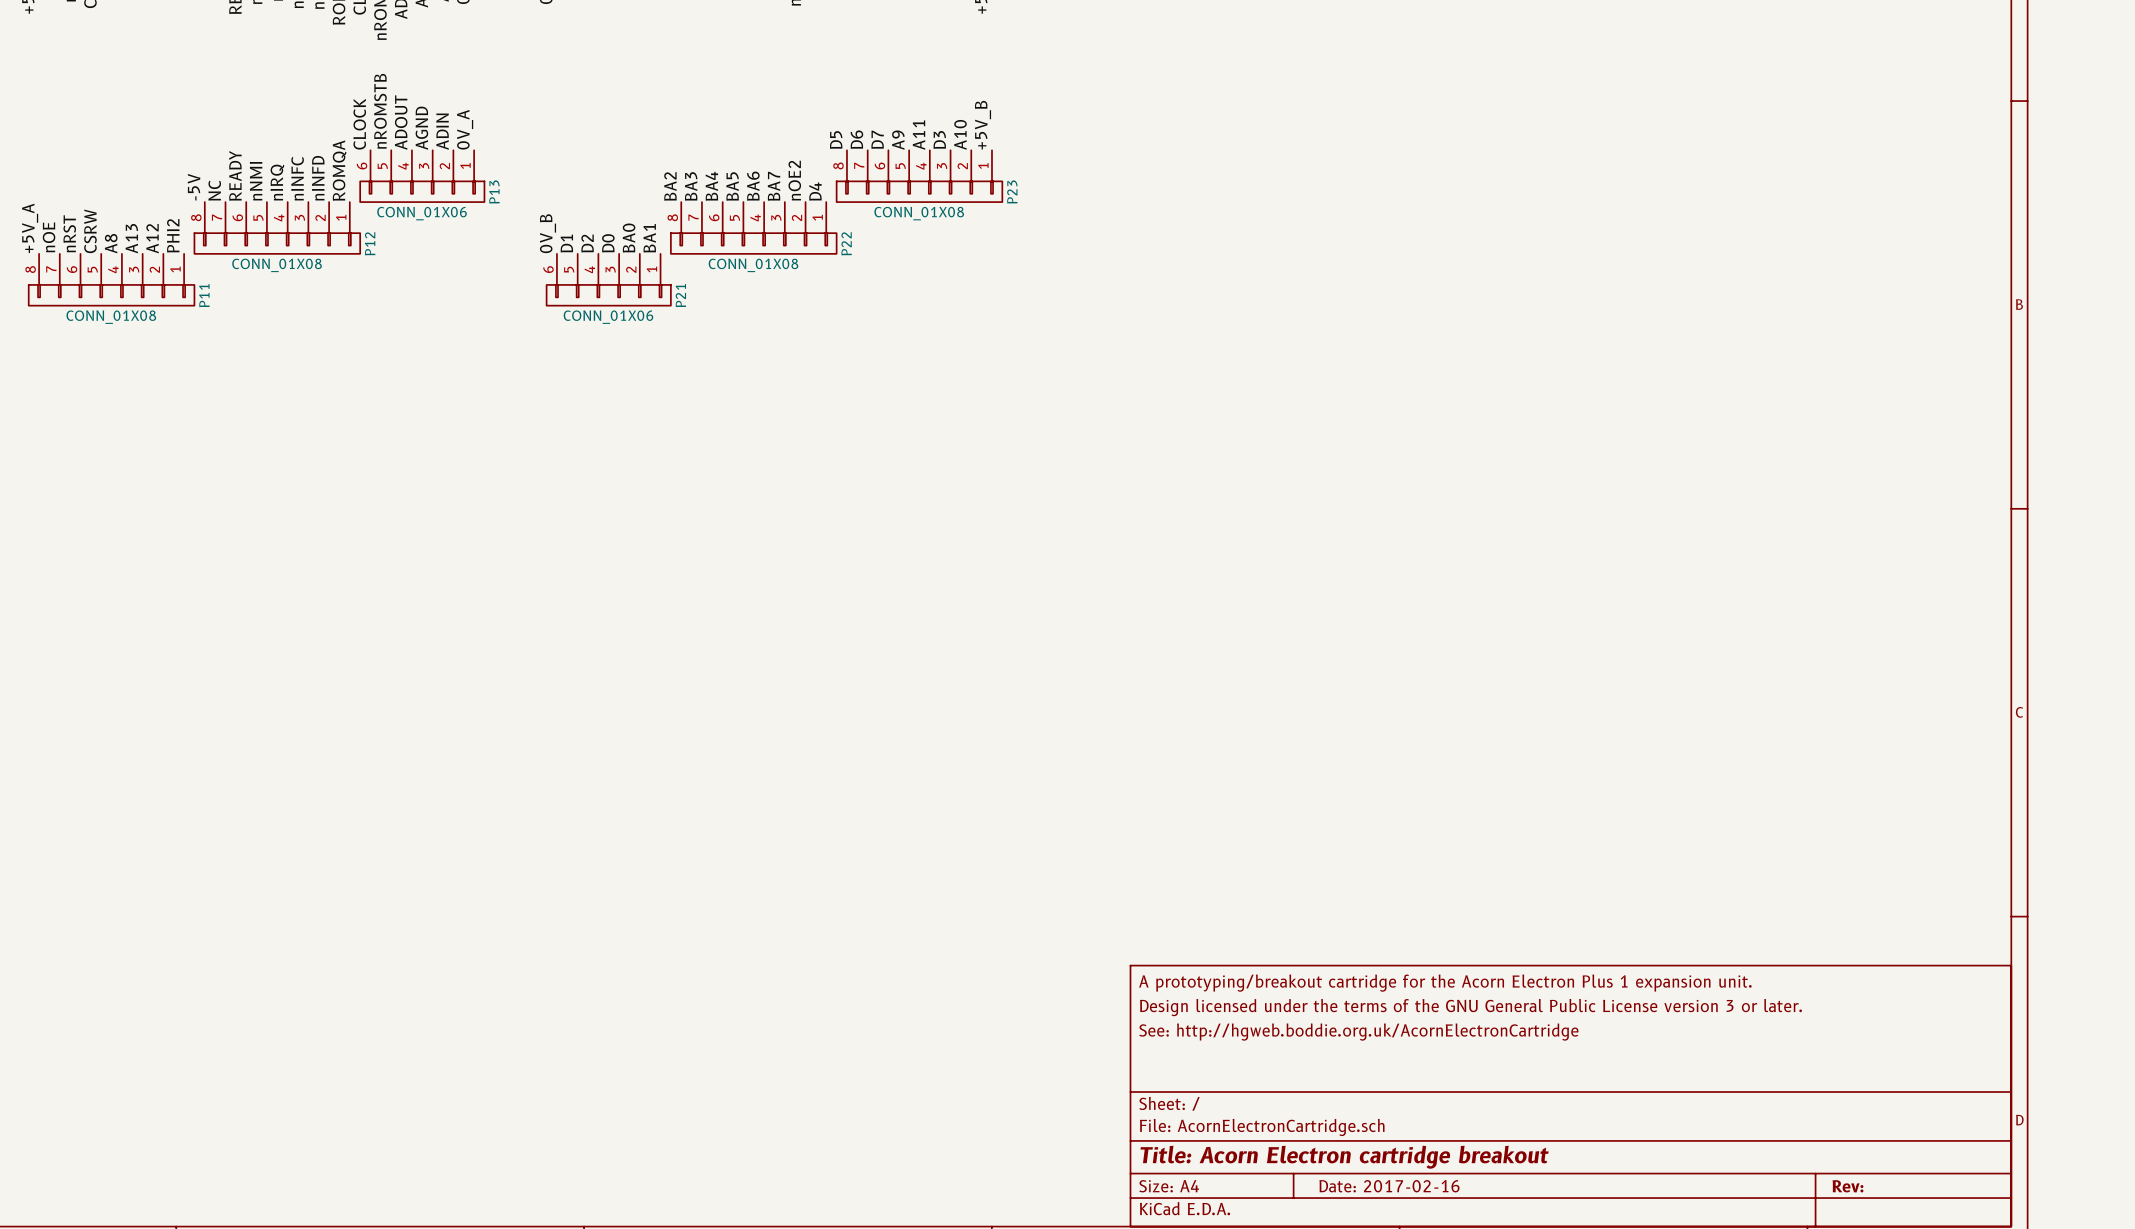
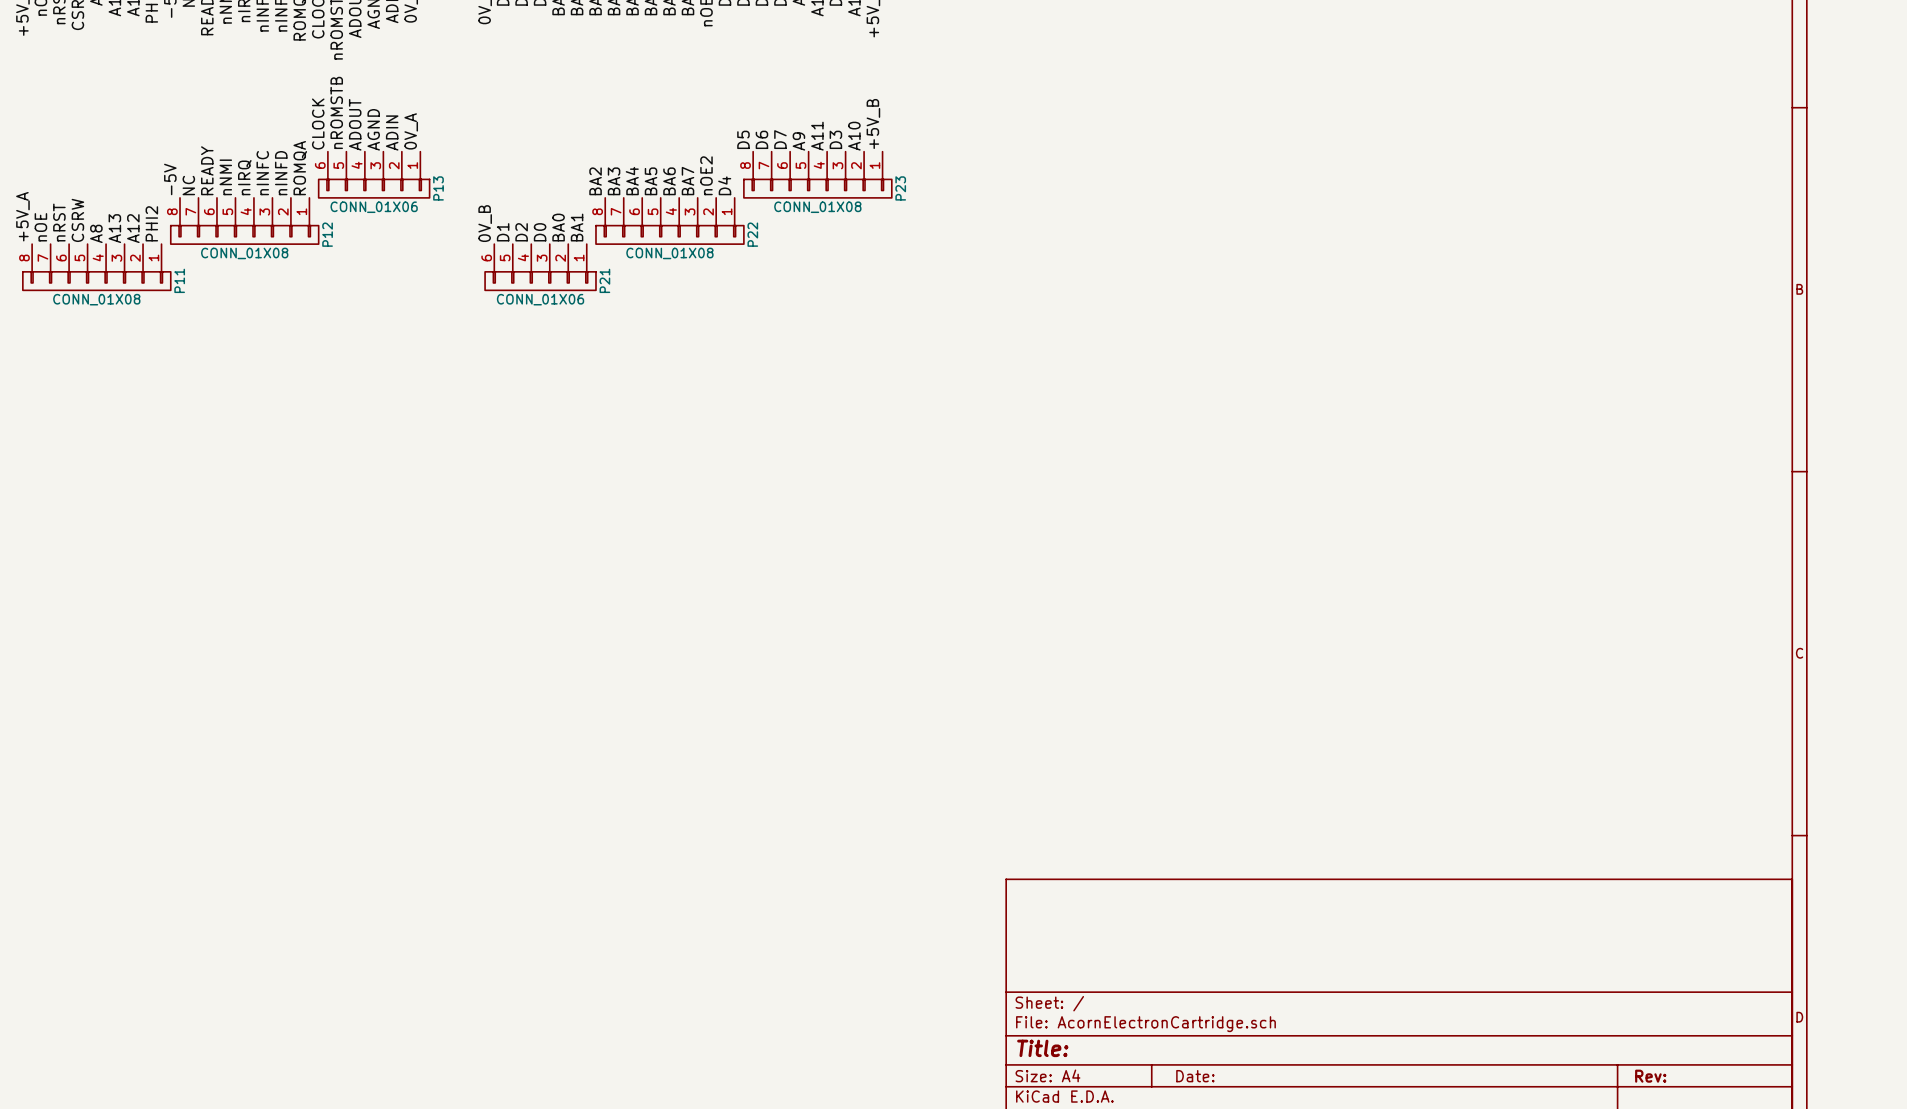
title block: A prototyping/breakout cartridge for the Acorn Electron Plus 1 expansion unit. (1445, 983) -> none
title block: Design licensed under the terms of the GNU General Public License version 3 or later. (1470, 1007) -> none
title block: See: http://hgweb.boddie.org.uk/AcornElectronCartridge (1358, 1032) -> none
title block: Title: Acorn Electron cartridge breakout (1344, 1157) -> Title: (1042, 1048)
title block: Date: 2017-02-16 (1389, 1186) -> Date: (1195, 1076)

